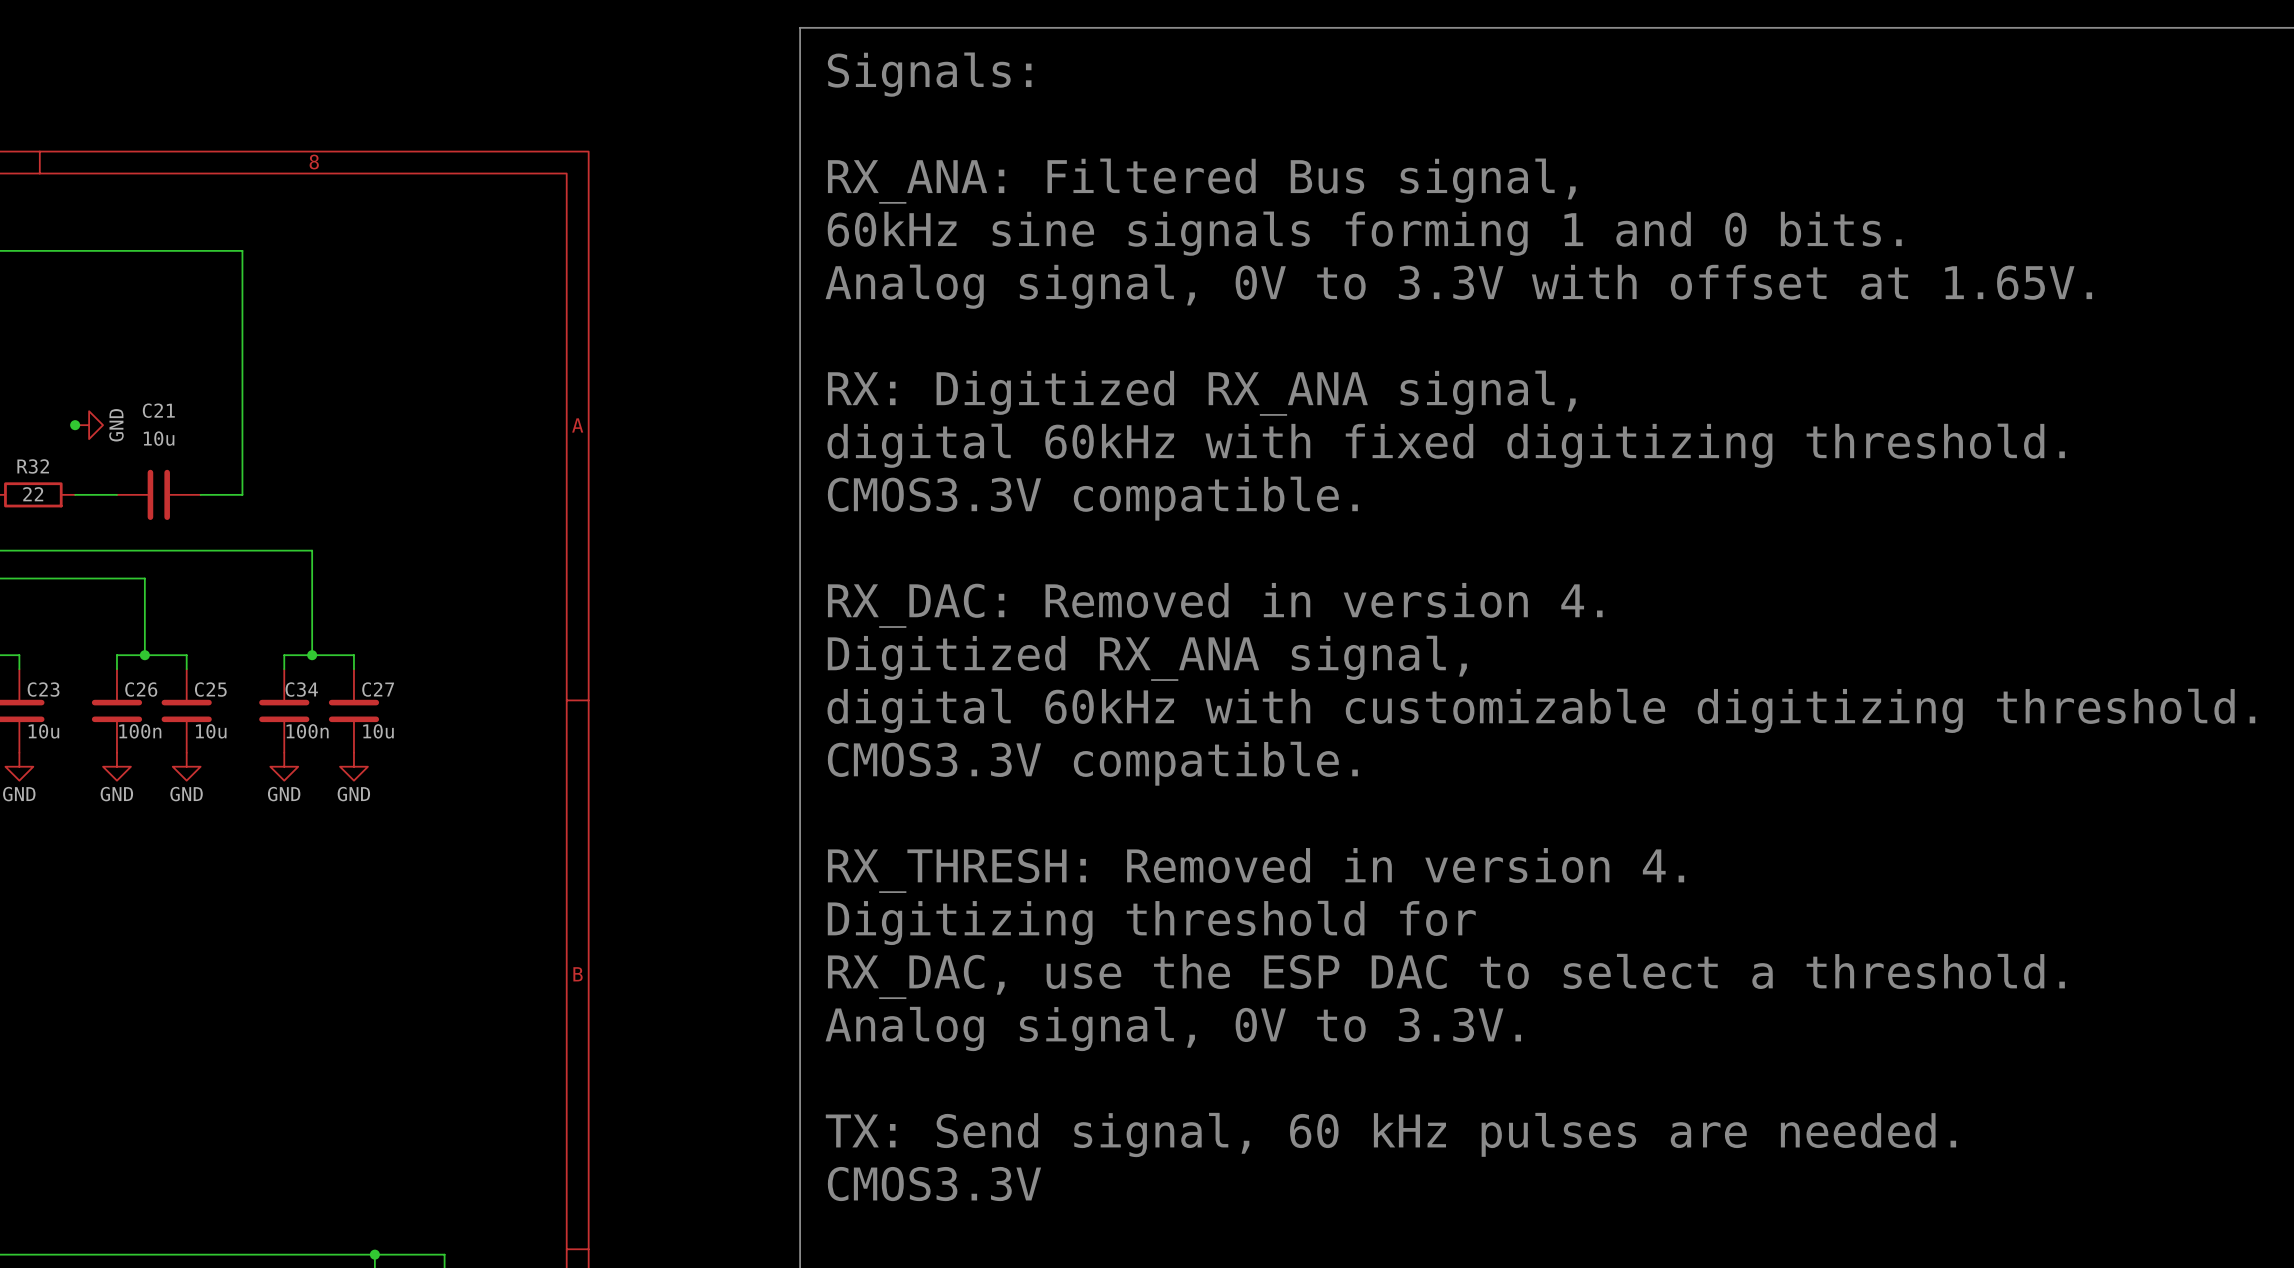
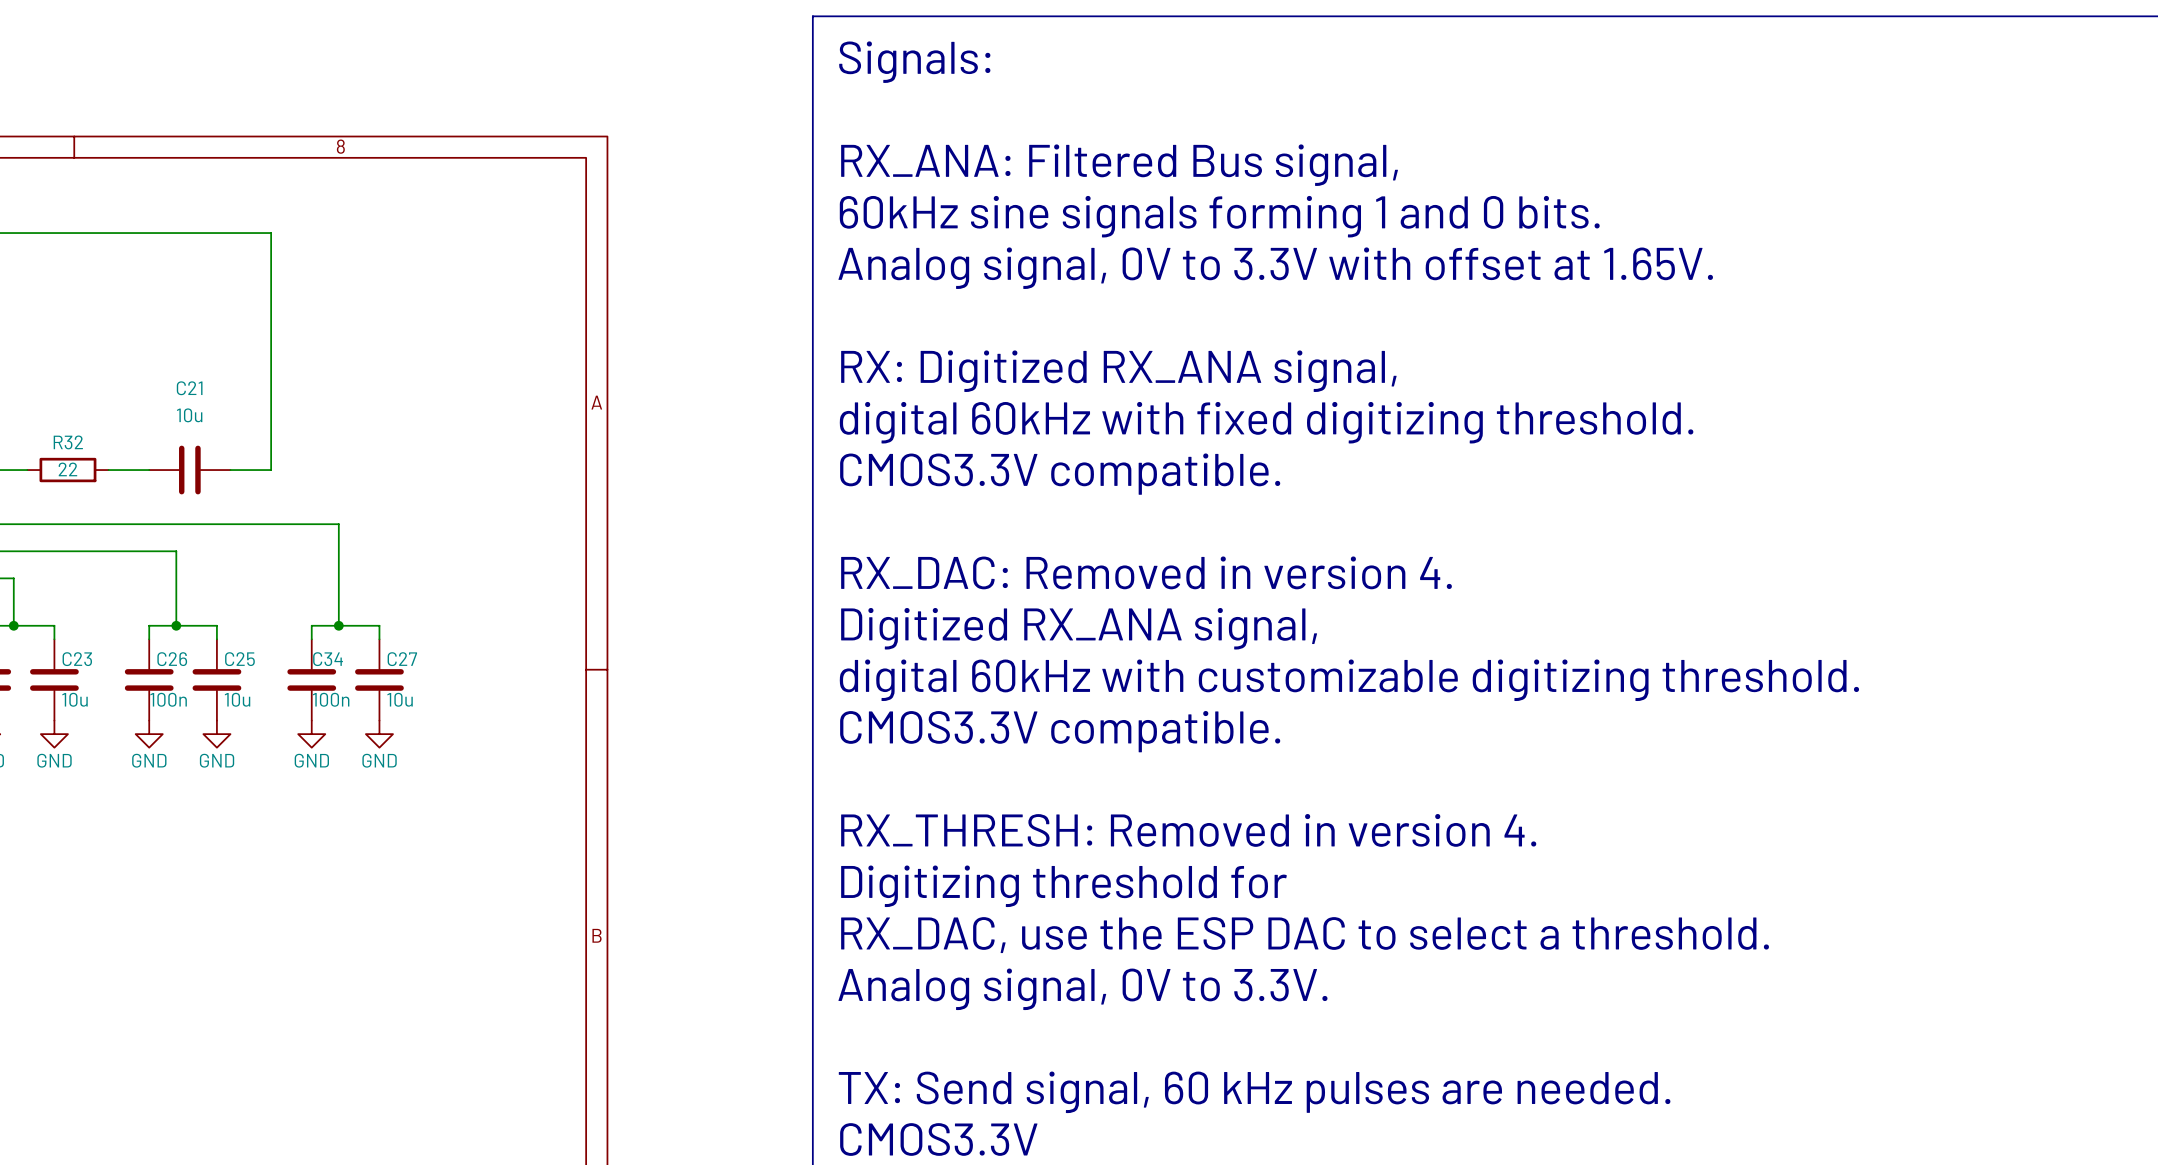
junction: (75, 425) -> none
power symbol: GND (89, 425) -> none

